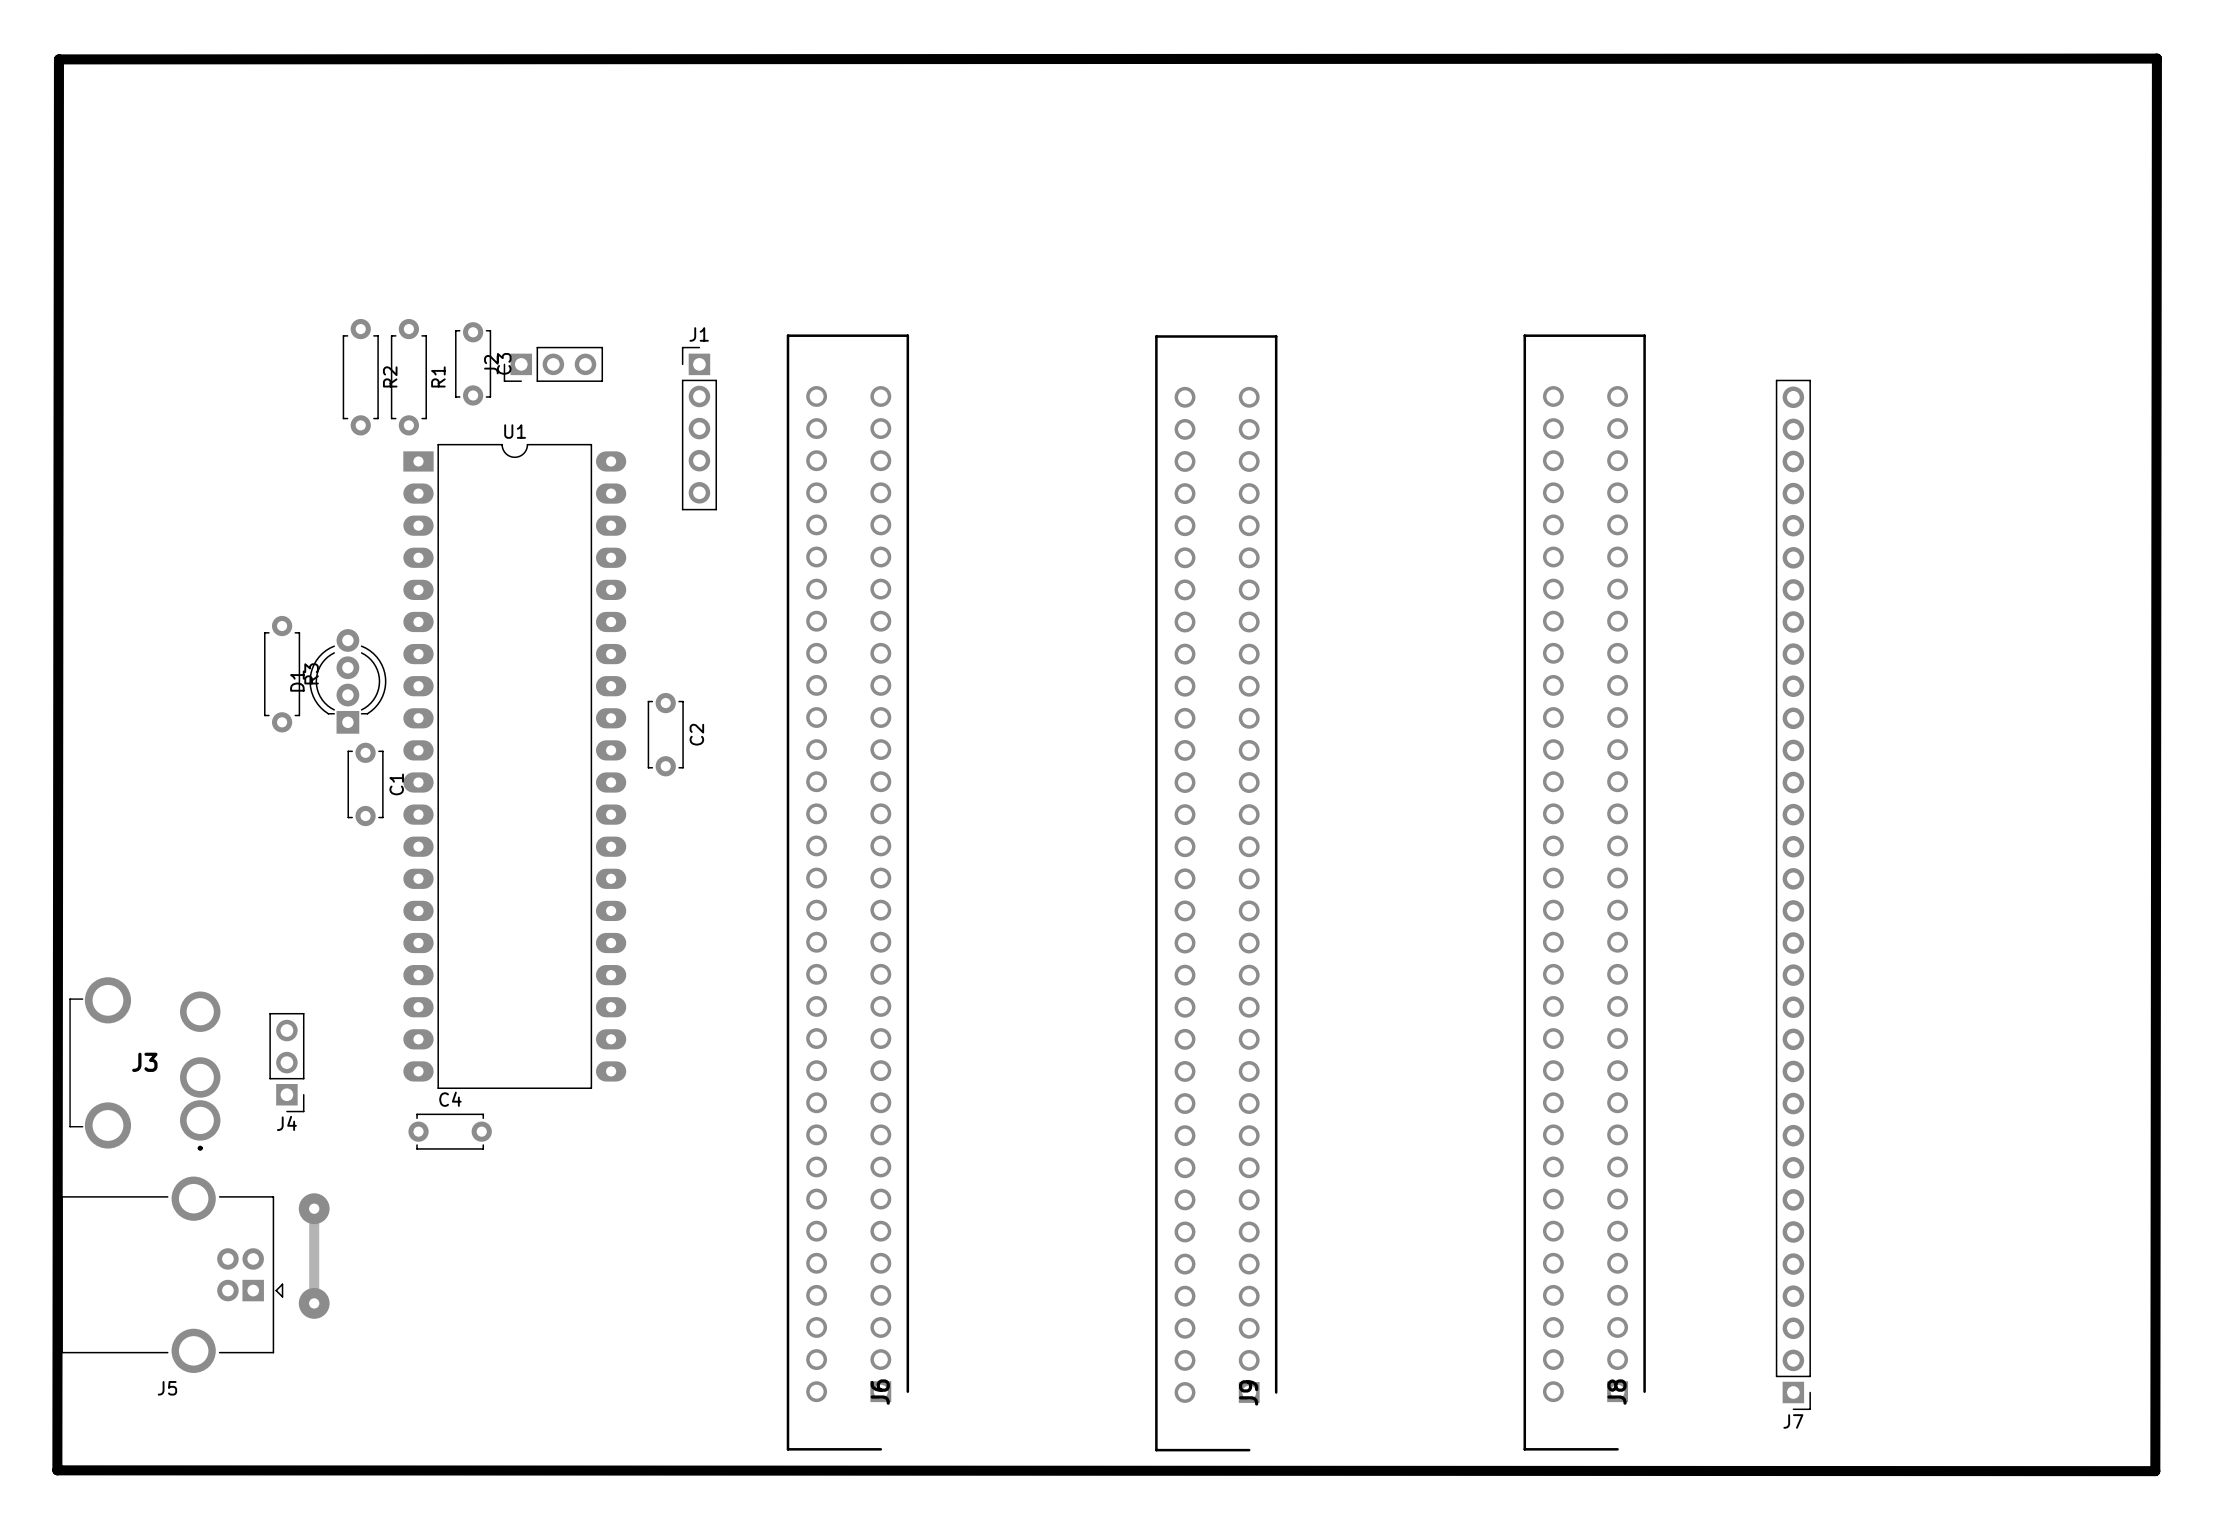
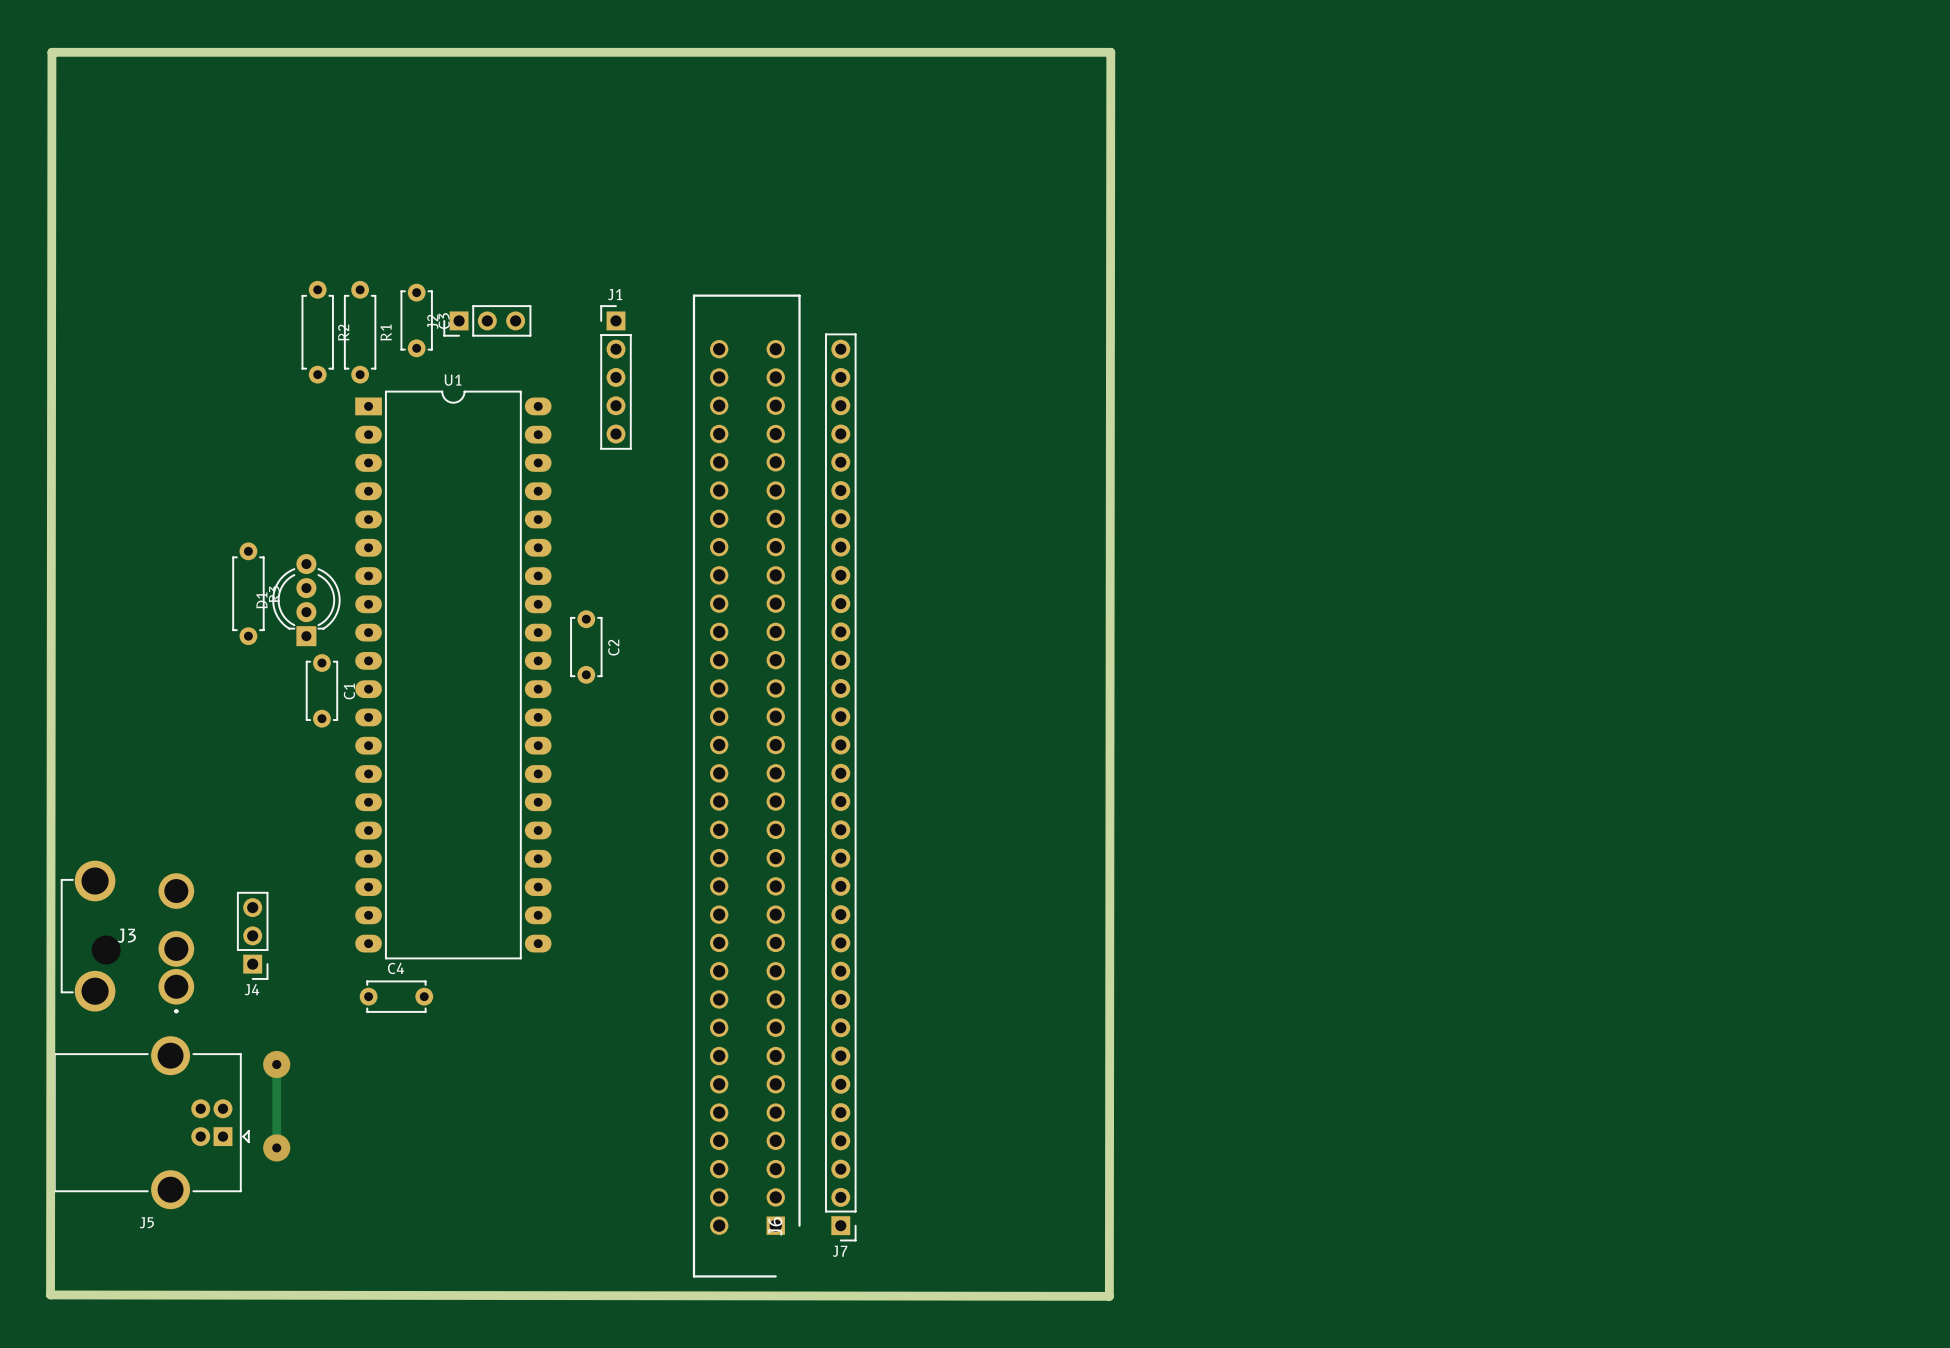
board edge: (58, 59) (2156, 58) (2155, 1471) (57, 1470) -> (51, 52) (1110, 52) (1109, 1296) (50, 1294)
J8: (1584, 892) -> none
J9: (1216, 893) -> none
J7 position: (1793, 894) -> (840, 787)

